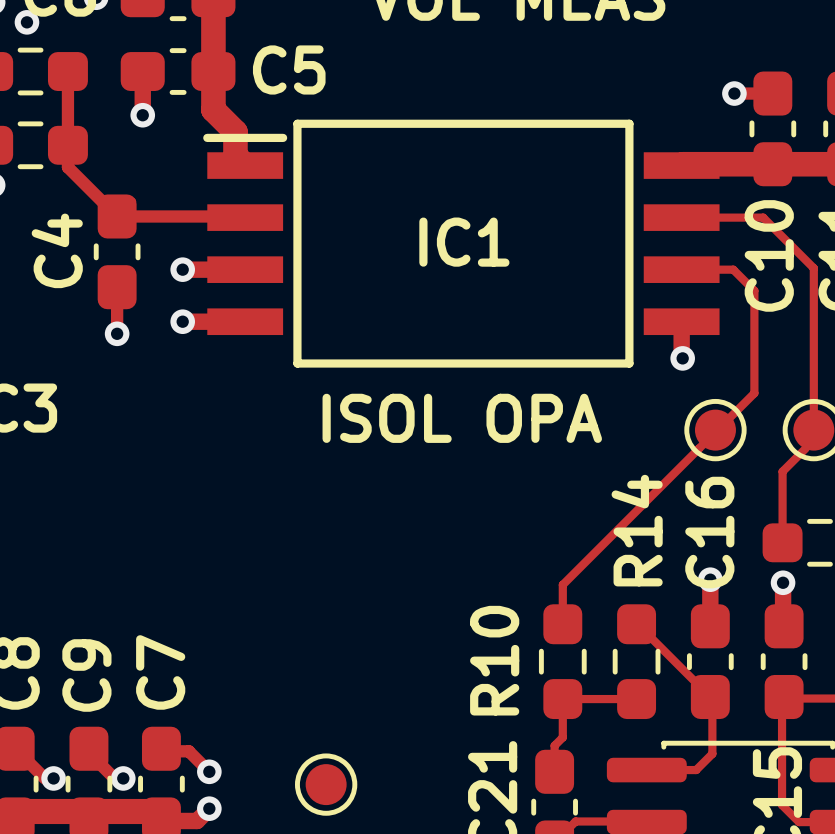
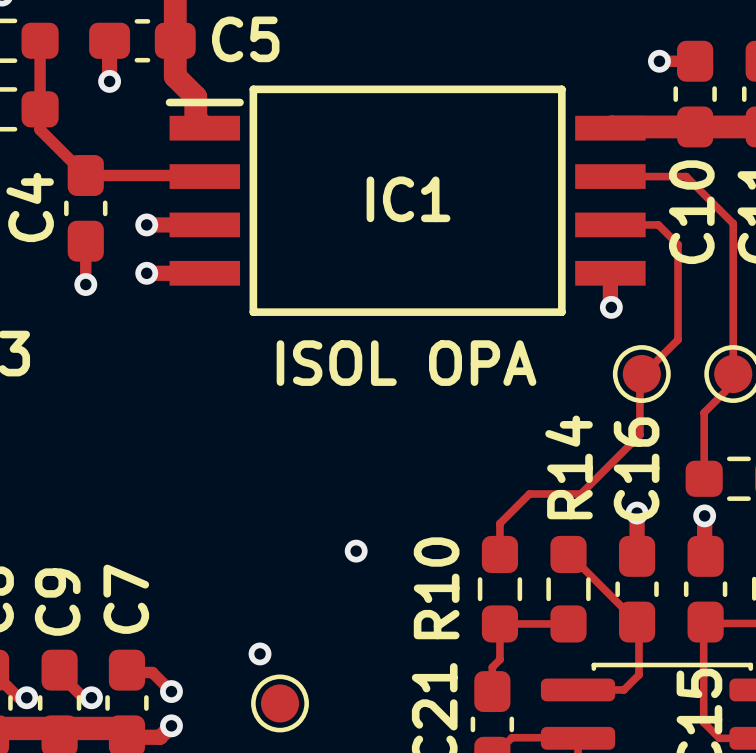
track: (713, 434) (562, 584) (562, 590) -> (639, 377) (639, 434) (580, 493) (529, 493) (499, 523)
via: none -> (356, 551)
via: none -> (260, 653)

